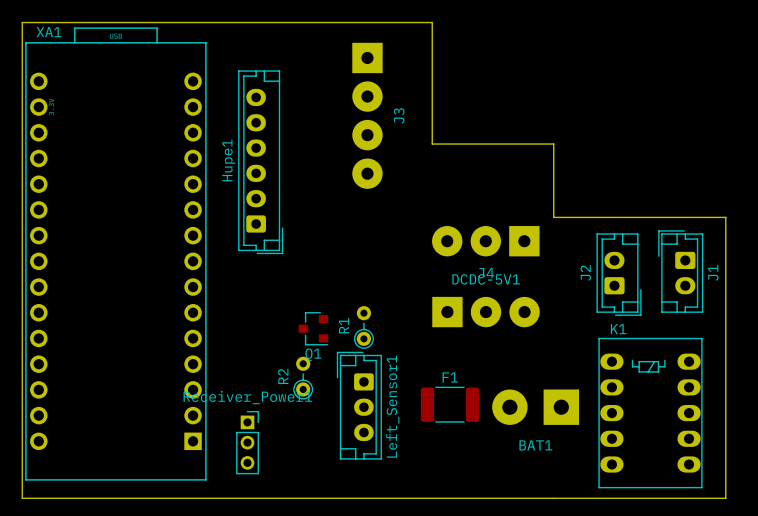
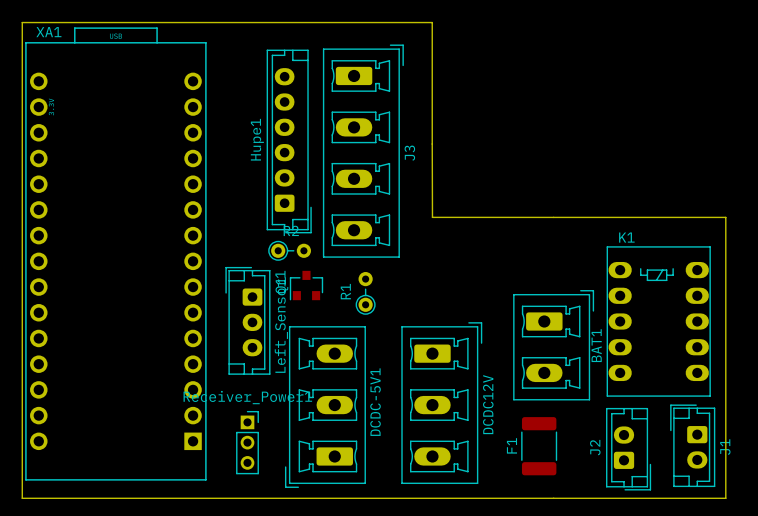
J3 footprint: [352, 42, 383, 189] -> [322, 44, 404, 258]
board edge: (432, 144) (553, 144) (553, 217) -> (432, 144) (432, 217) (553, 217)
Hupe1 position: (260, 162) -> (289, 141)
DCDC-5V1 footprint: [432, 226, 540, 257] -> [285, 326, 366, 488]
J1 position: (680, 271) -> (692, 445)
J2 position: (619, 274) -> (628, 449)
DCDC-5V1 name position: DCDC-5V1 (486, 279) -> DCDC-5V1 (375, 402)
J4: (485, 312) -> none
R1 position: (363, 327) -> (365, 293)
Q1 rotation: 0° (313, 328) -> 90° clockwise (306, 285)
Q1 position: (313, 328) -> (306, 285)
F1 name position: F1 (450, 377) -> F1 (511, 445)
R2 rotation: 0° (303, 378) -> 90° clockwise (289, 250)
R2 position: (303, 378) -> (289, 250)
BAT1 footprint: [492, 389, 580, 425] -> [513, 290, 595, 401]
DCDC12V: none -> (441, 403)
F1 rotation: 0° (449, 404) -> 90° clockwise (539, 446)
F1 position: (449, 404) -> (539, 446)
Left_Sensor1 position: (359, 405) -> (247, 320)
K1 position: (650, 413) -> (658, 321)
BAT1 name position: BAT1 (535, 445) -> BAT1 (596, 345)

